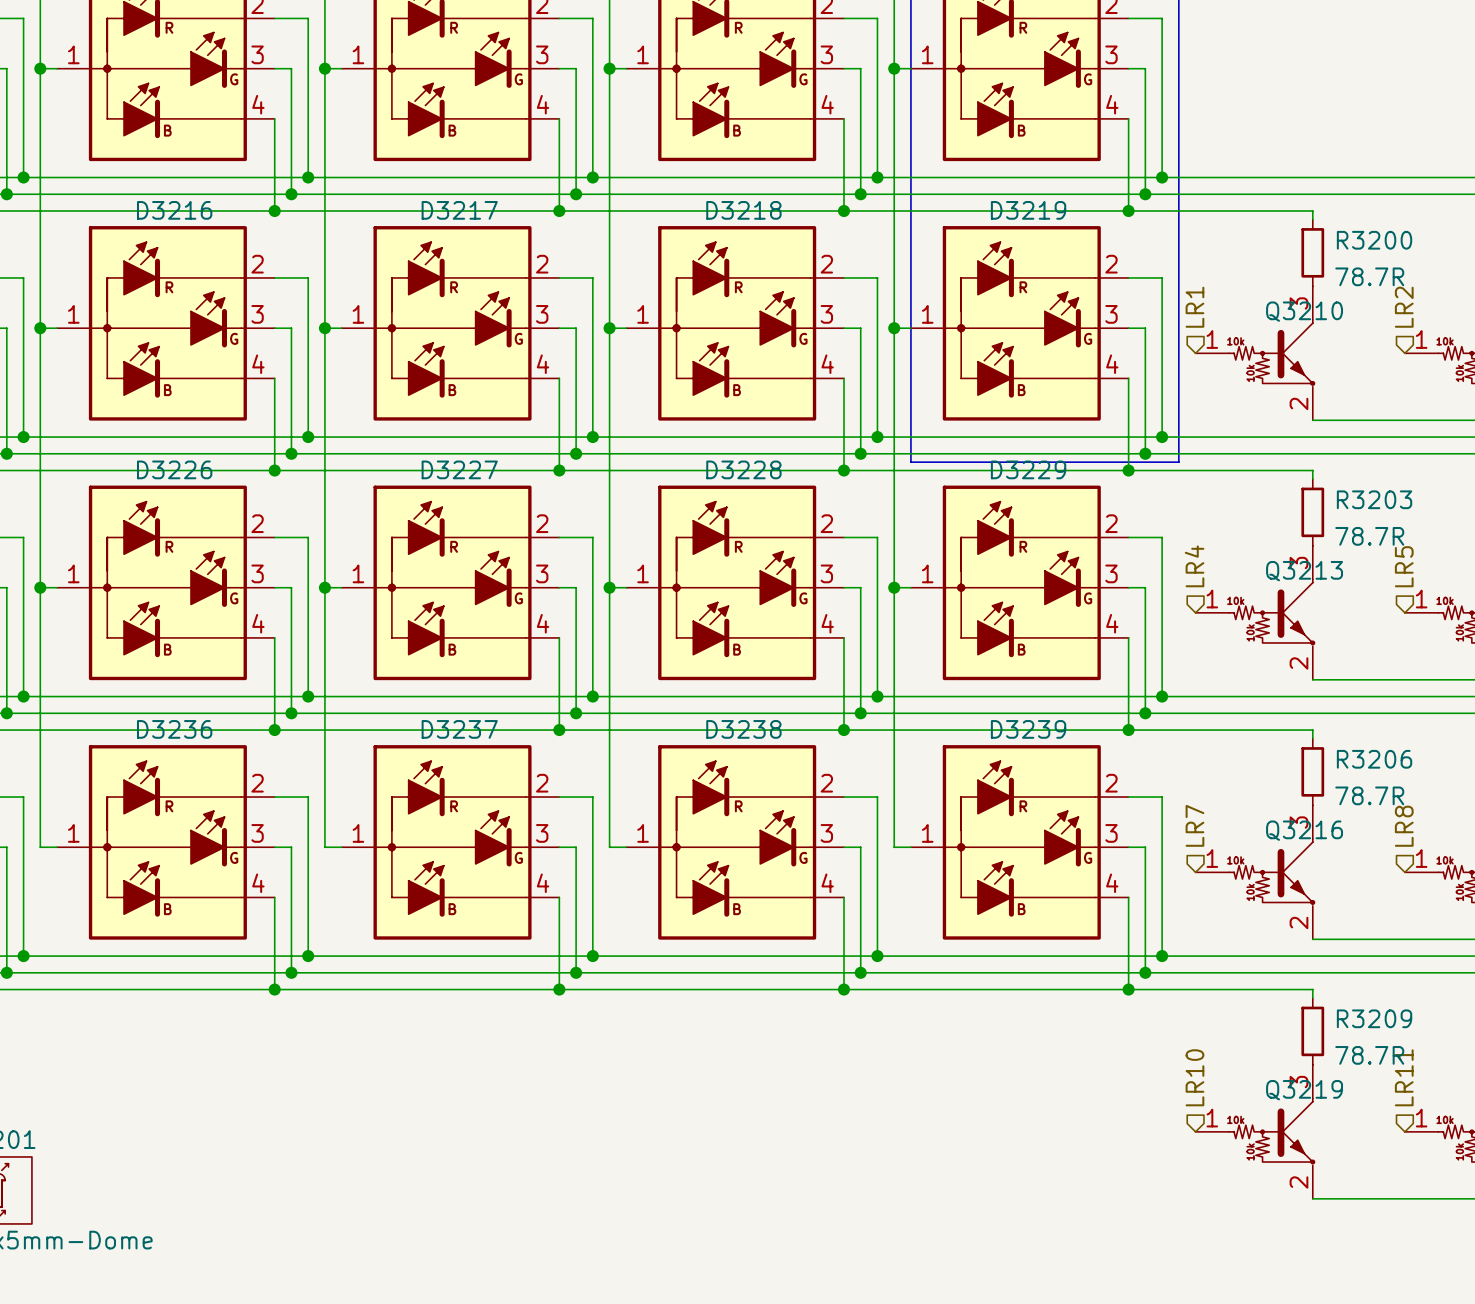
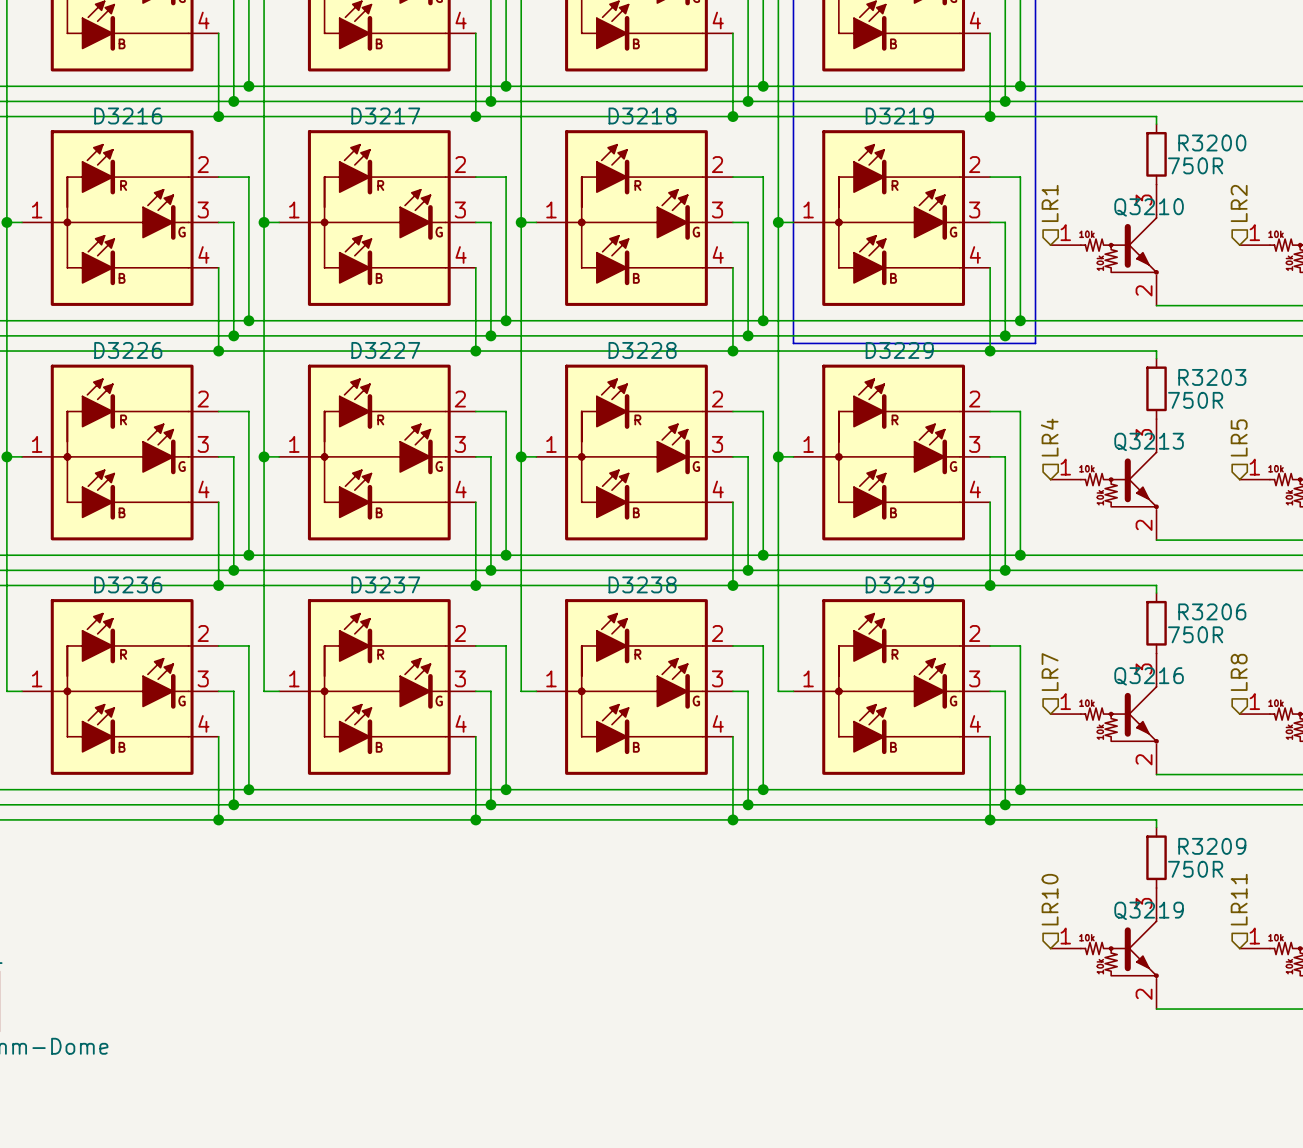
R3200 value: 78.7R (1369, 276) -> 750R (1195, 165)
R3203 value: 78.7R (1369, 536) -> 750R (1195, 400)
R3206 value: 78.7R (1369, 795) -> 750R (1195, 634)
R3209 value: 78.7R (1369, 1055) -> 750R (1195, 869)

